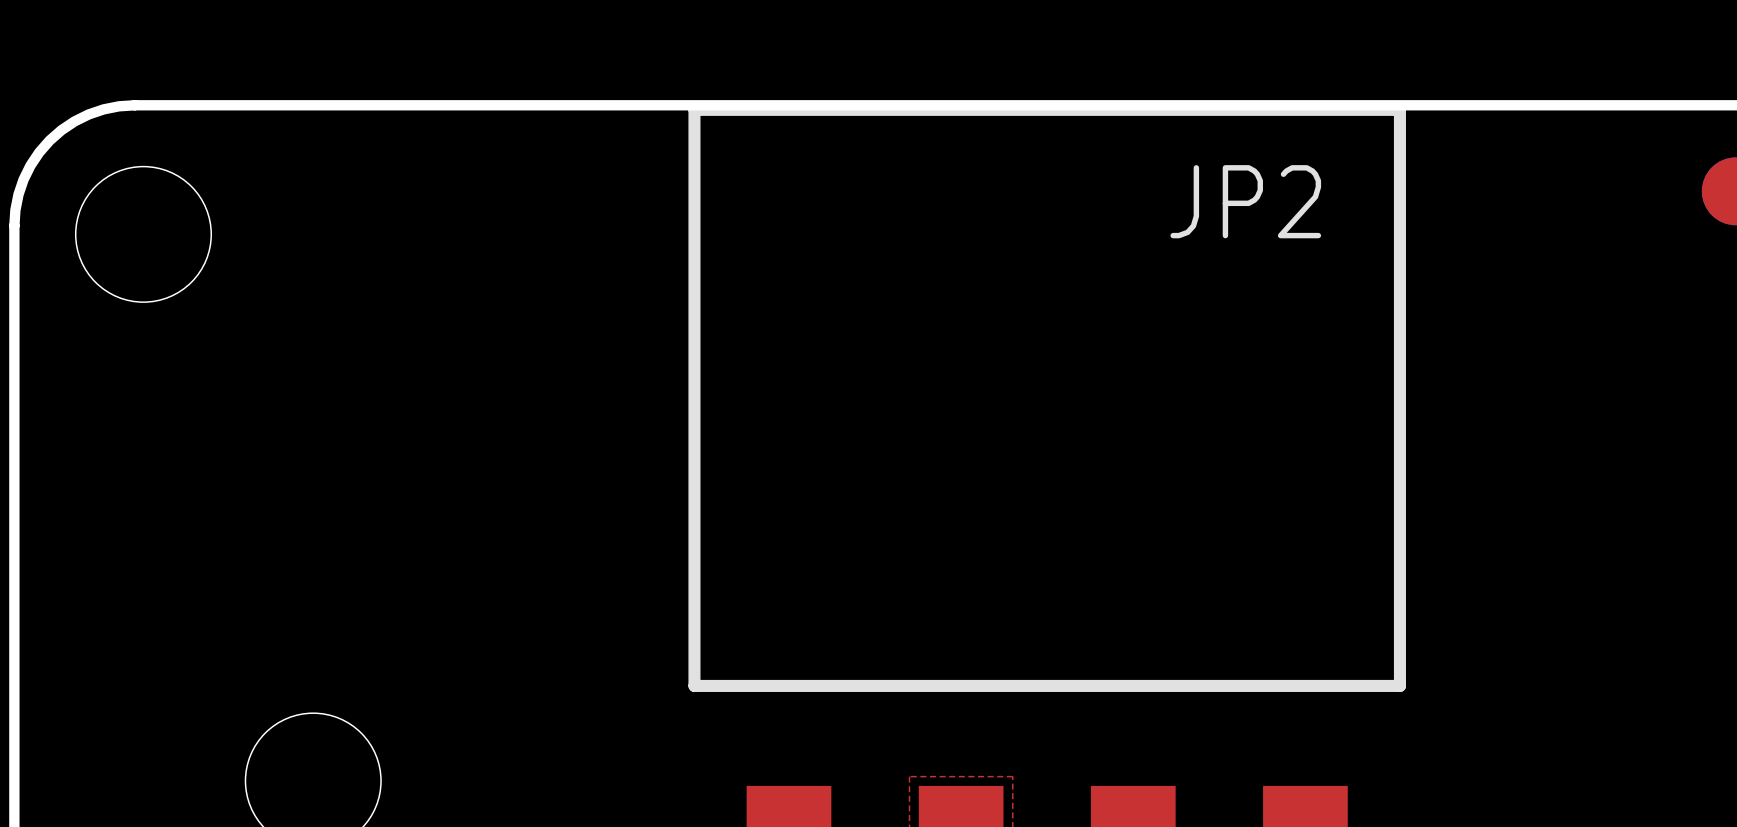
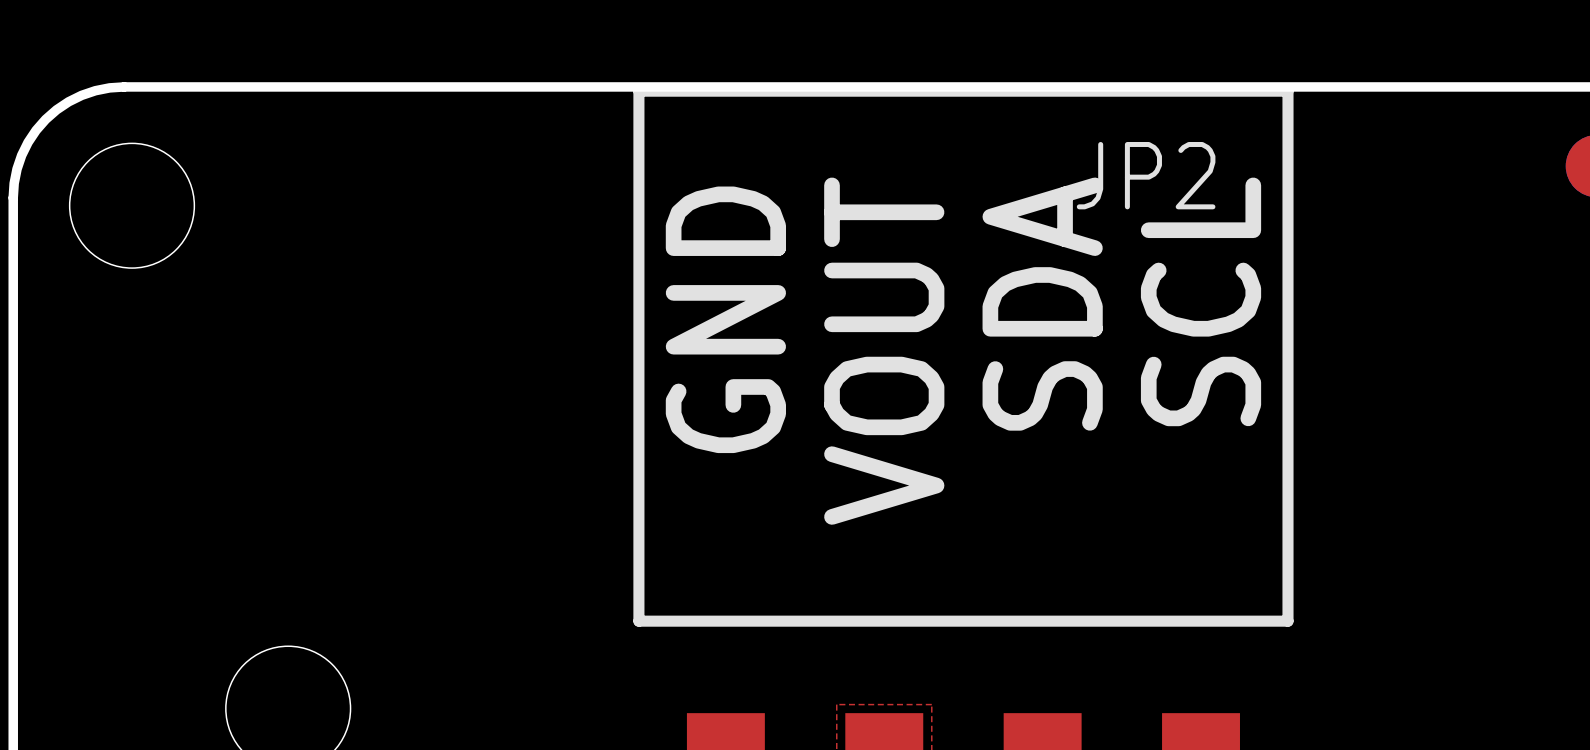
text: none -> SCL (1201, 301)
text: none -> SDA (1042, 304)
text: none -> GND (725, 319)
text: none -> VOUT (884, 351)

